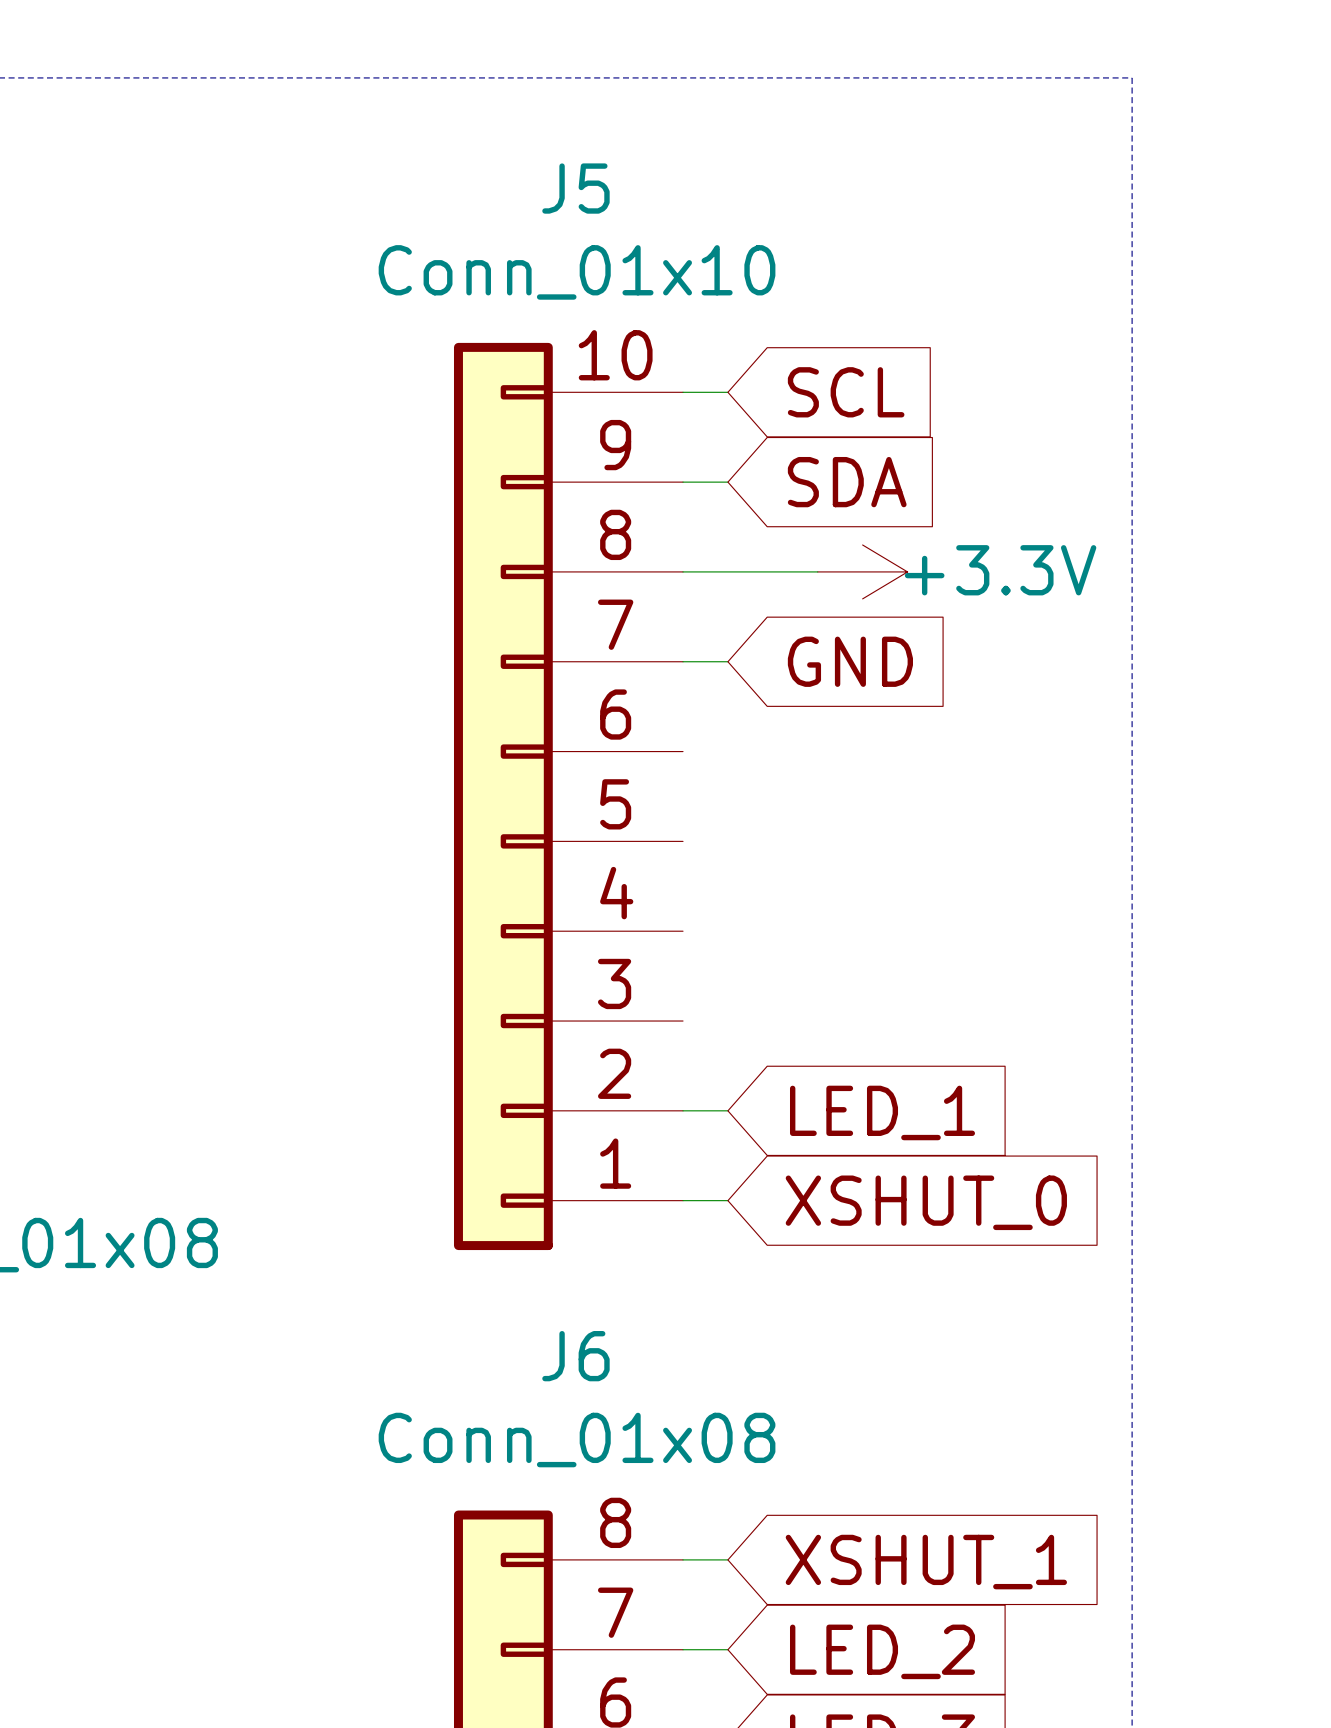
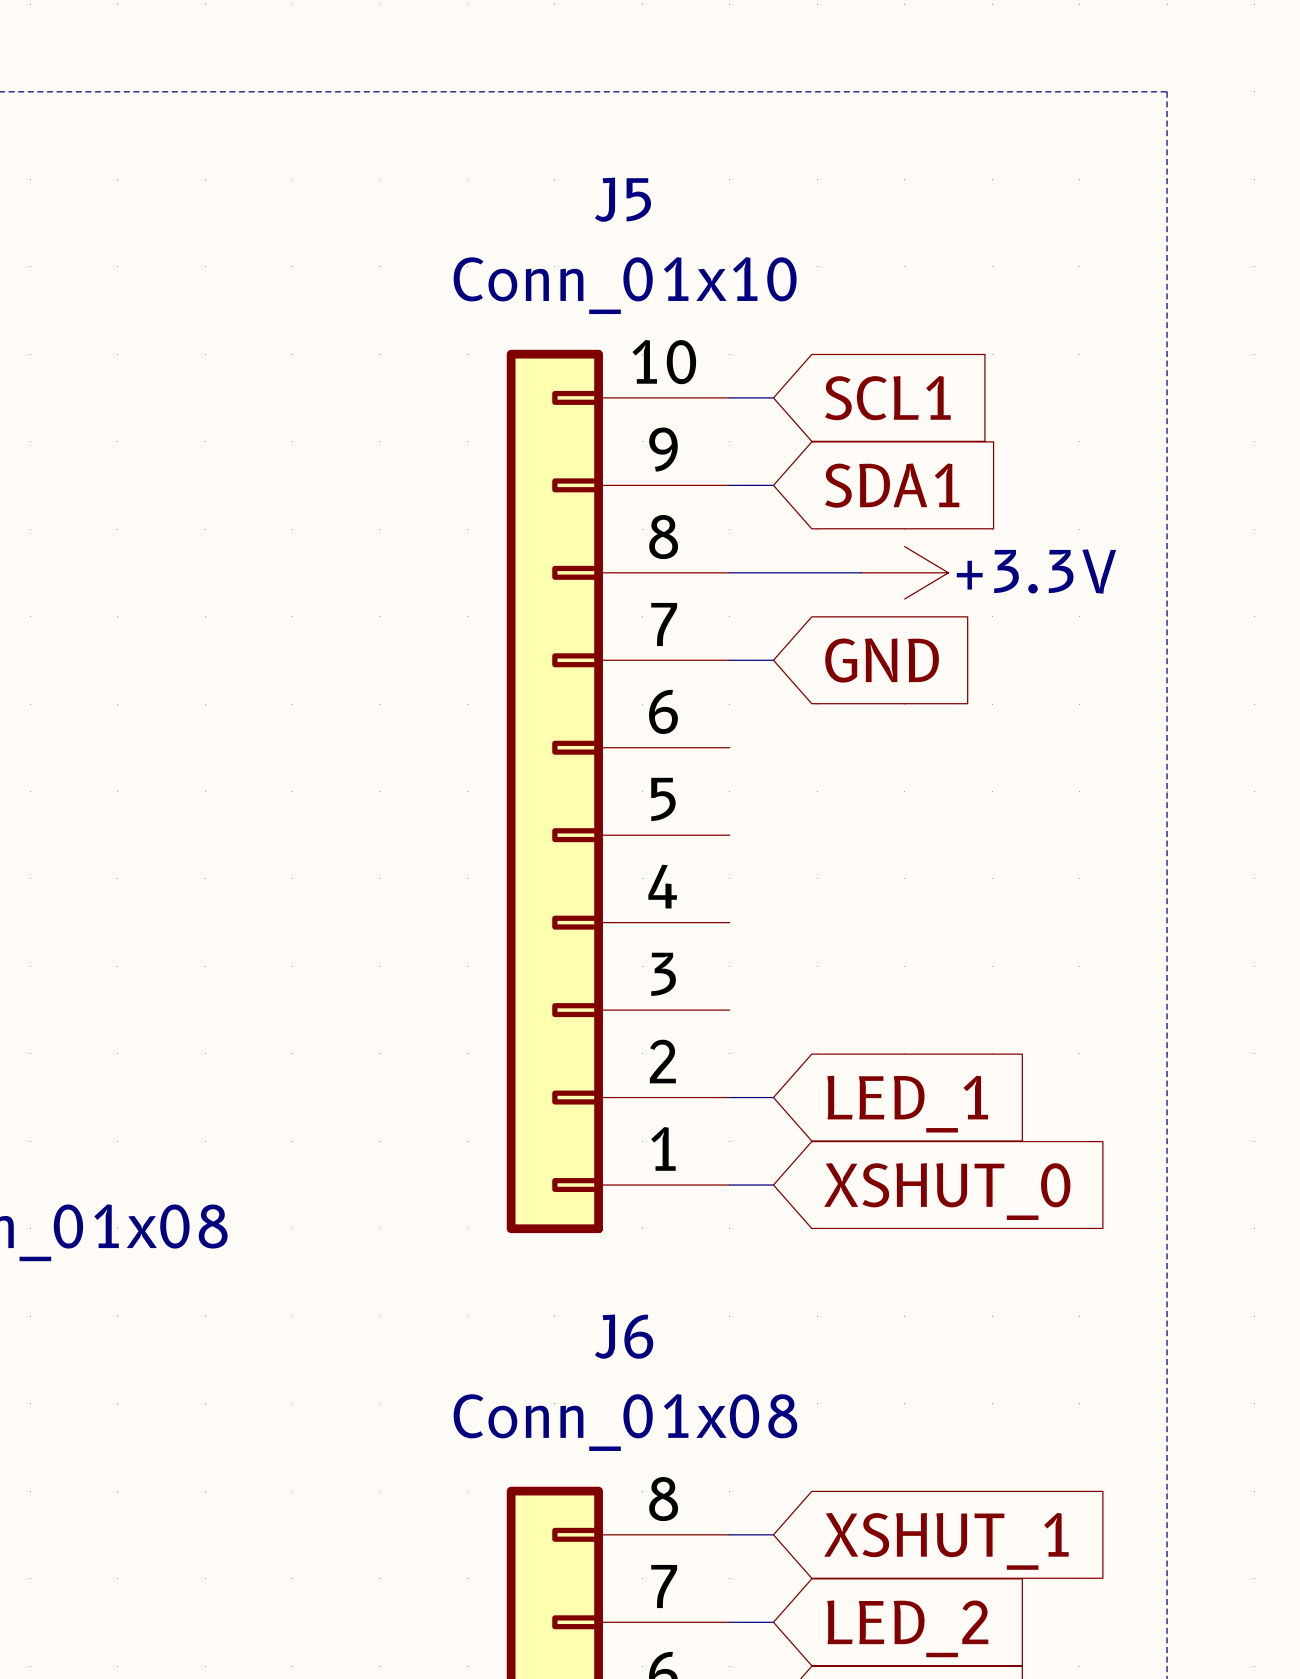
global label: SCL (846, 392) -> SCL1 (887, 398)
global label: SDA (847, 482) -> SDA1 (892, 485)

